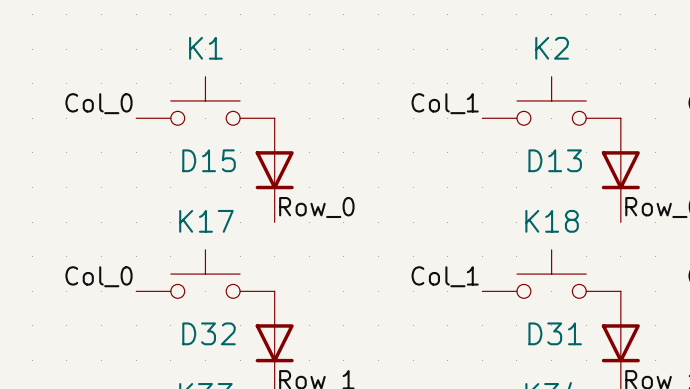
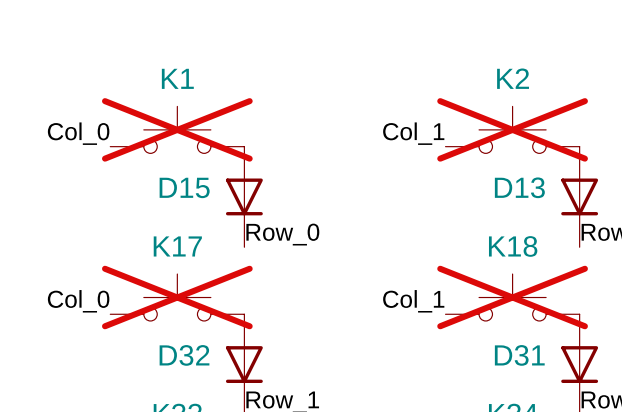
K1 do-not-place cross: none -> (177, 129)
K2 do-not-place cross: none -> (512, 129)
K17 do-not-place cross: none -> (177, 297)
K18 do-not-place cross: none -> (512, 297)

